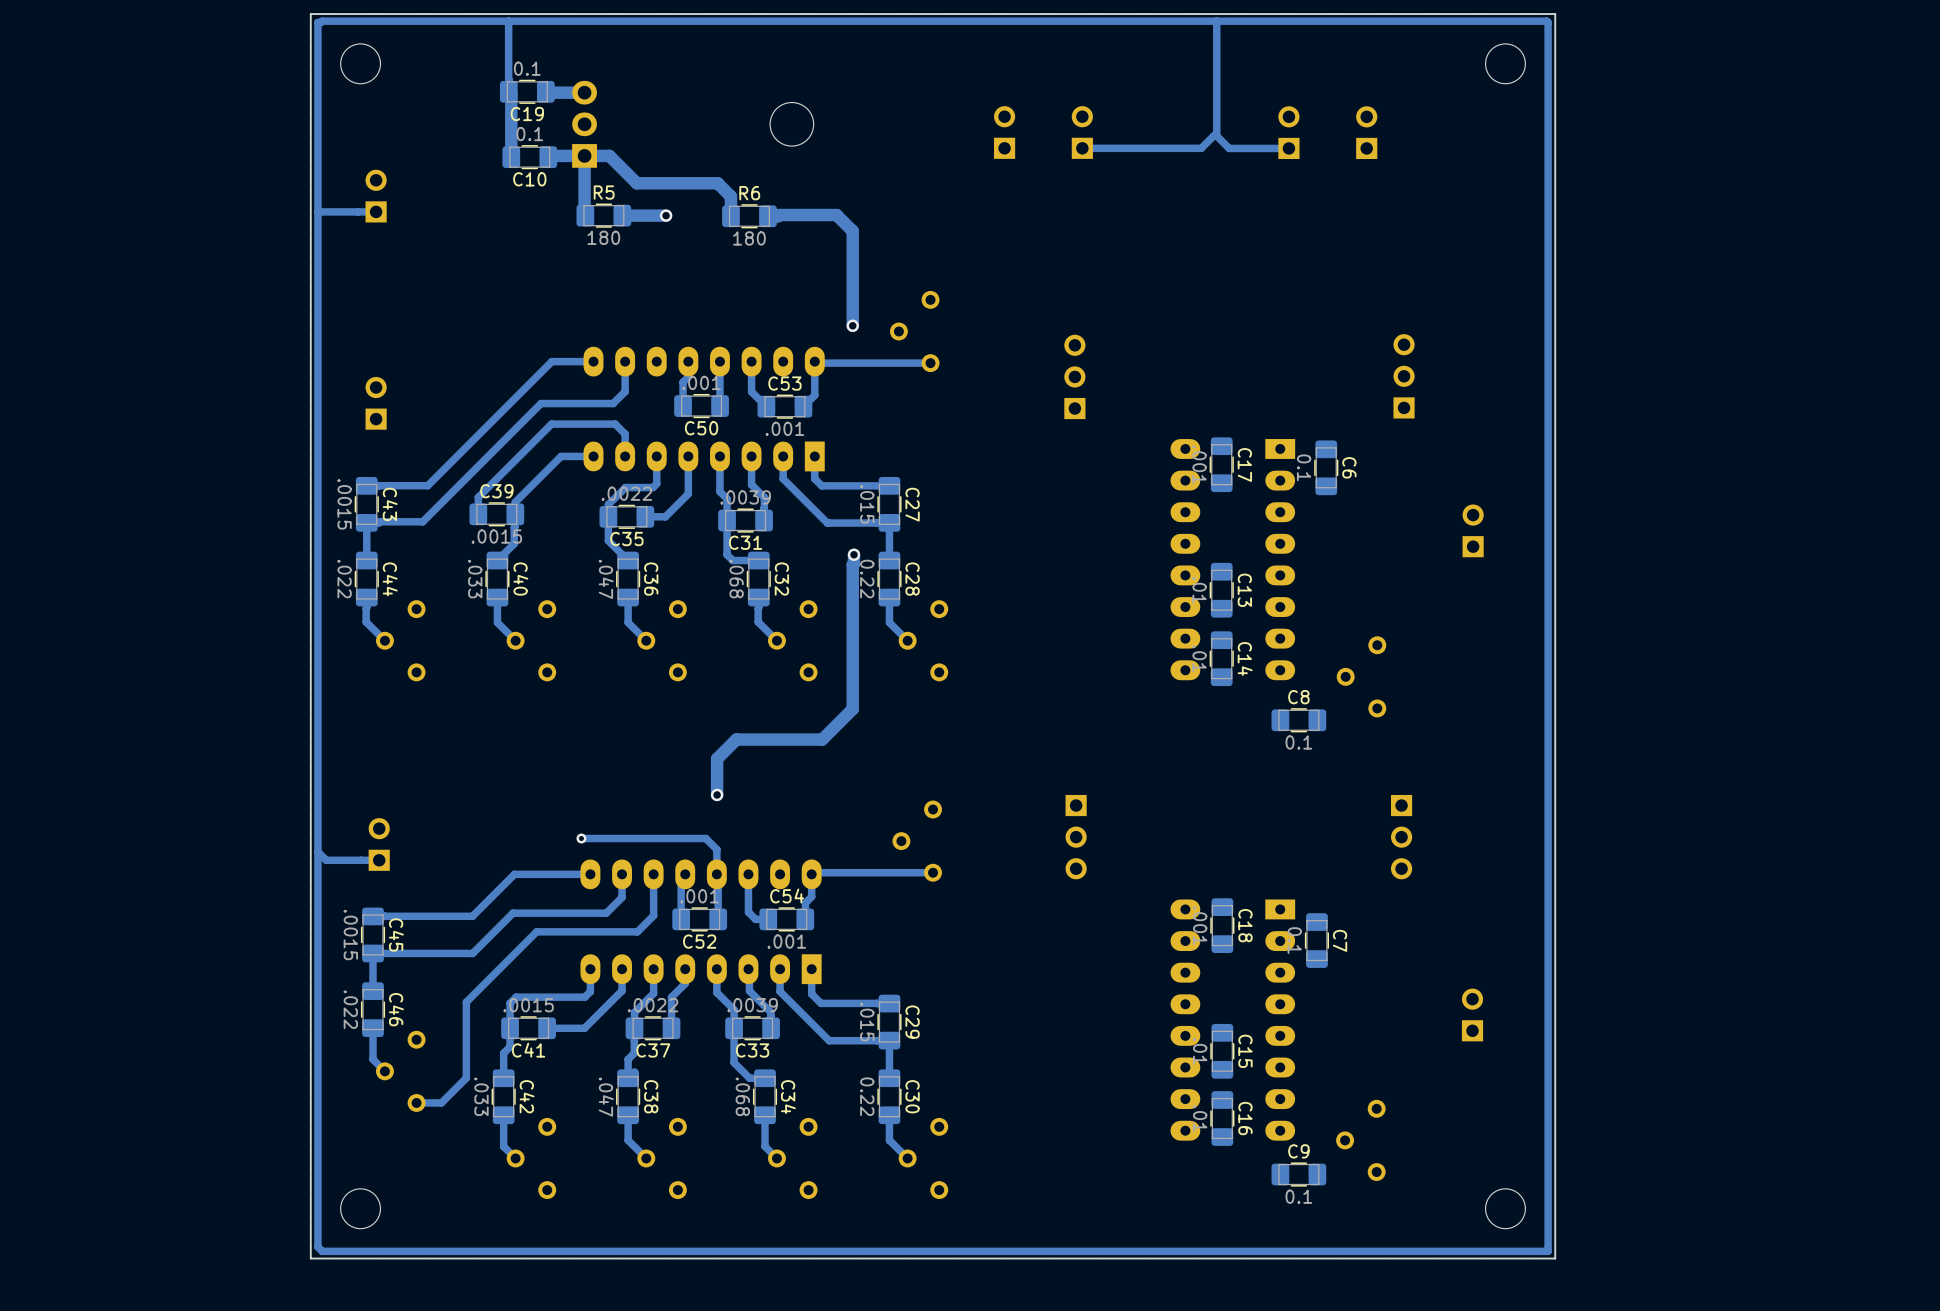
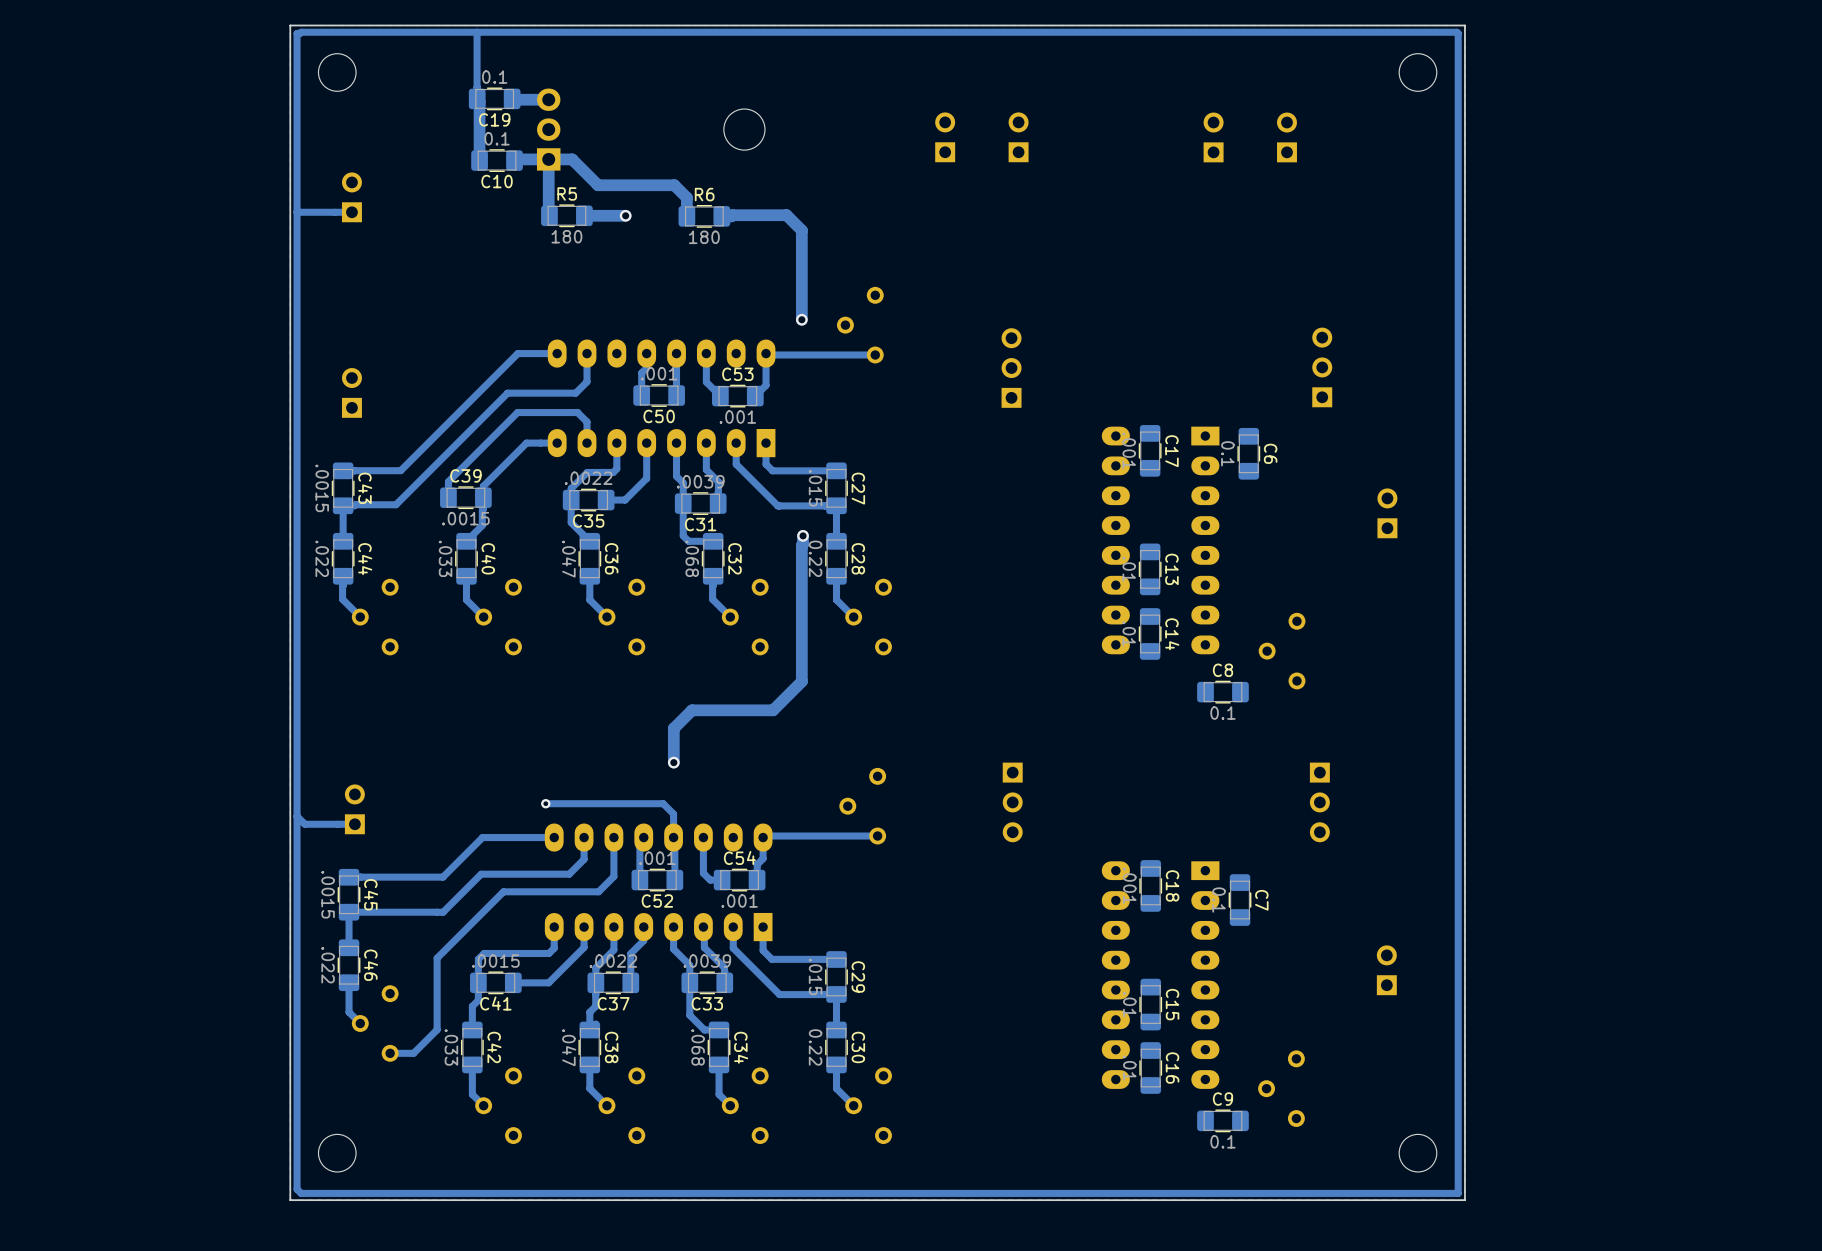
track: (1216, 21) (1216, 136) -> none
track: (1216, 136) (1229, 148) (1288, 148) -> none
track: (1216, 136) (1213, 136) (1201, 148) (1082, 148) -> none

